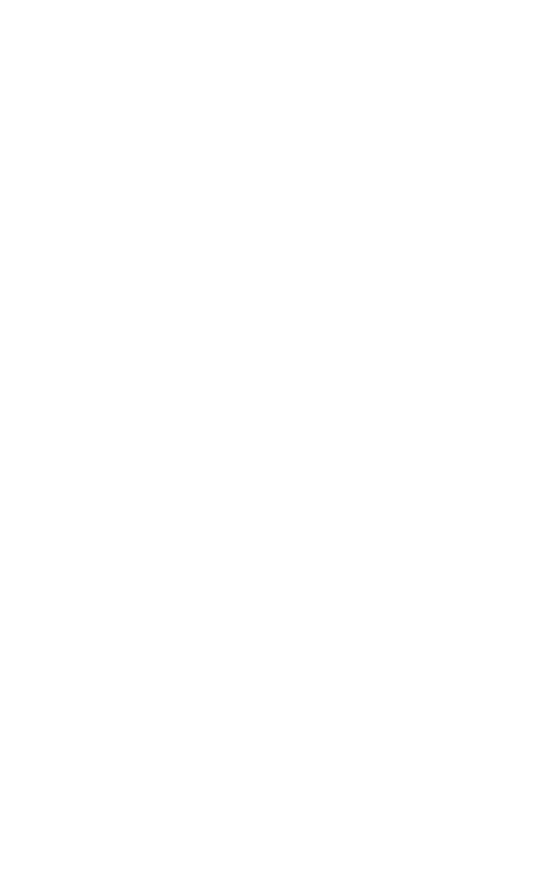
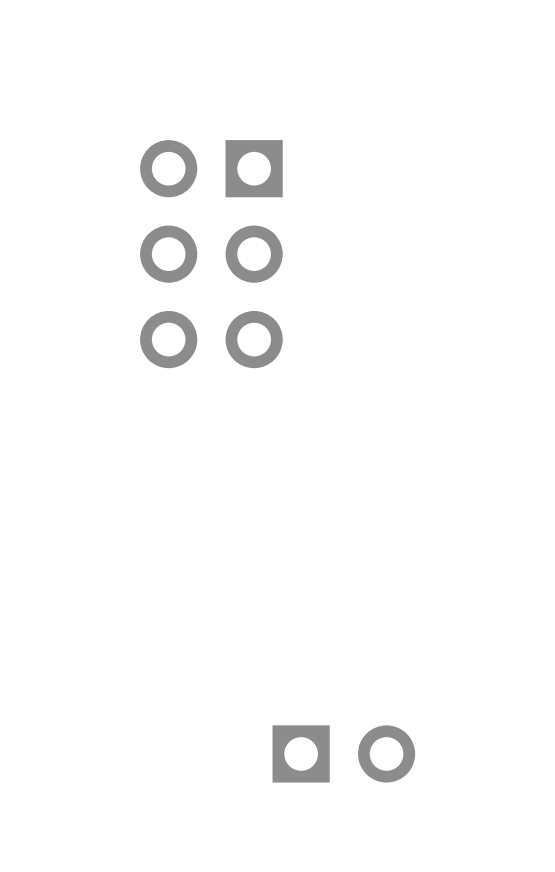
part: none -> (211, 254)
part: none -> (343, 753)

